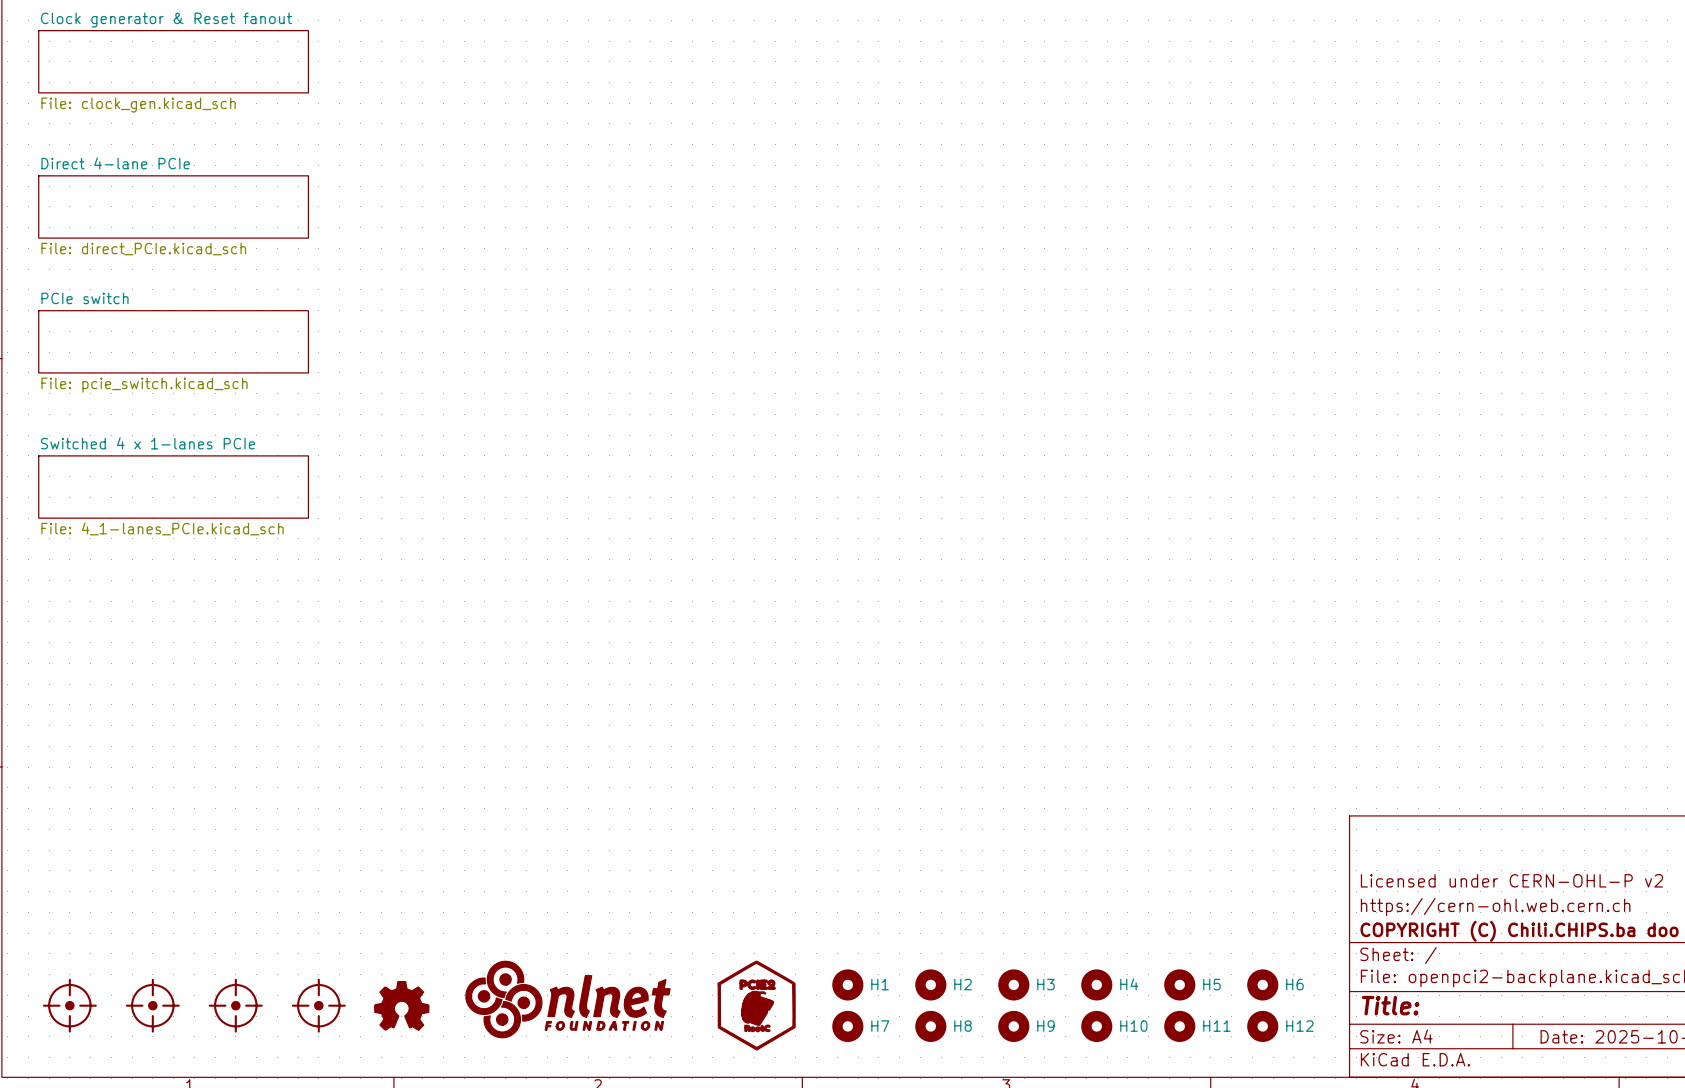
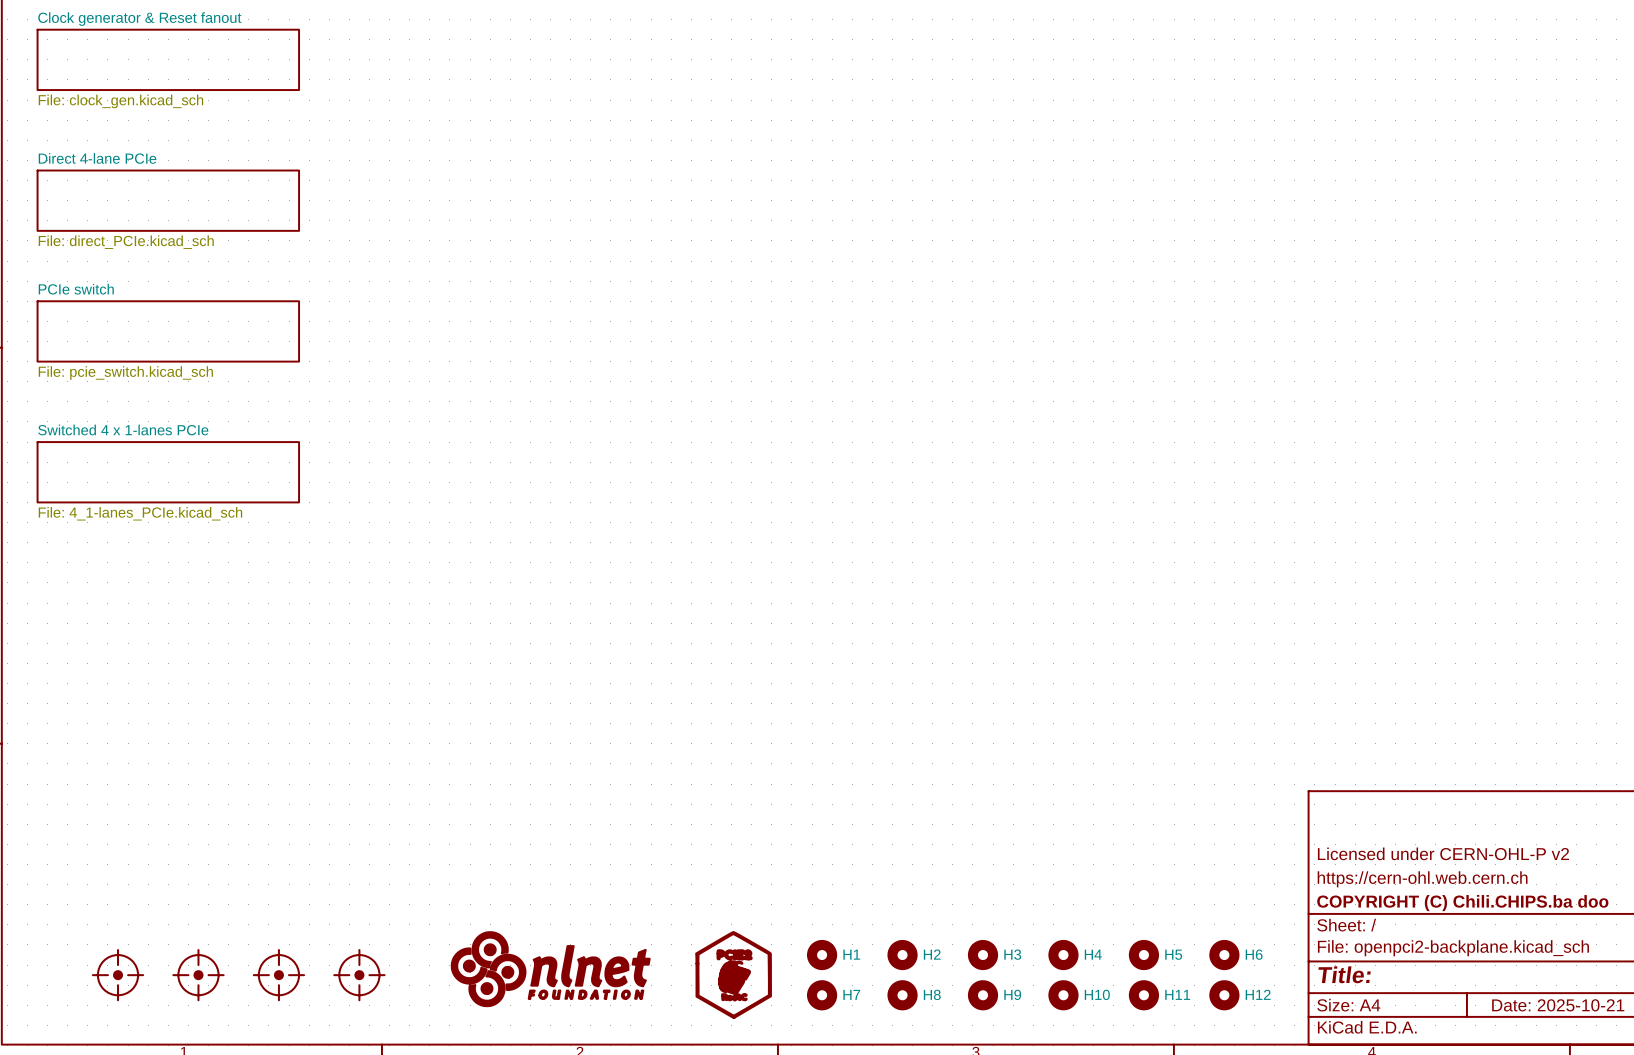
part: (69, 1005) -> none
part: none -> (118, 975)
part: (152, 1005) -> none
part: none -> (198, 975)
part: (235, 1005) -> none
part: none -> (278, 975)
part: (318, 1005) -> none
part: none -> (359, 975)
part: (401, 1005) -> none

